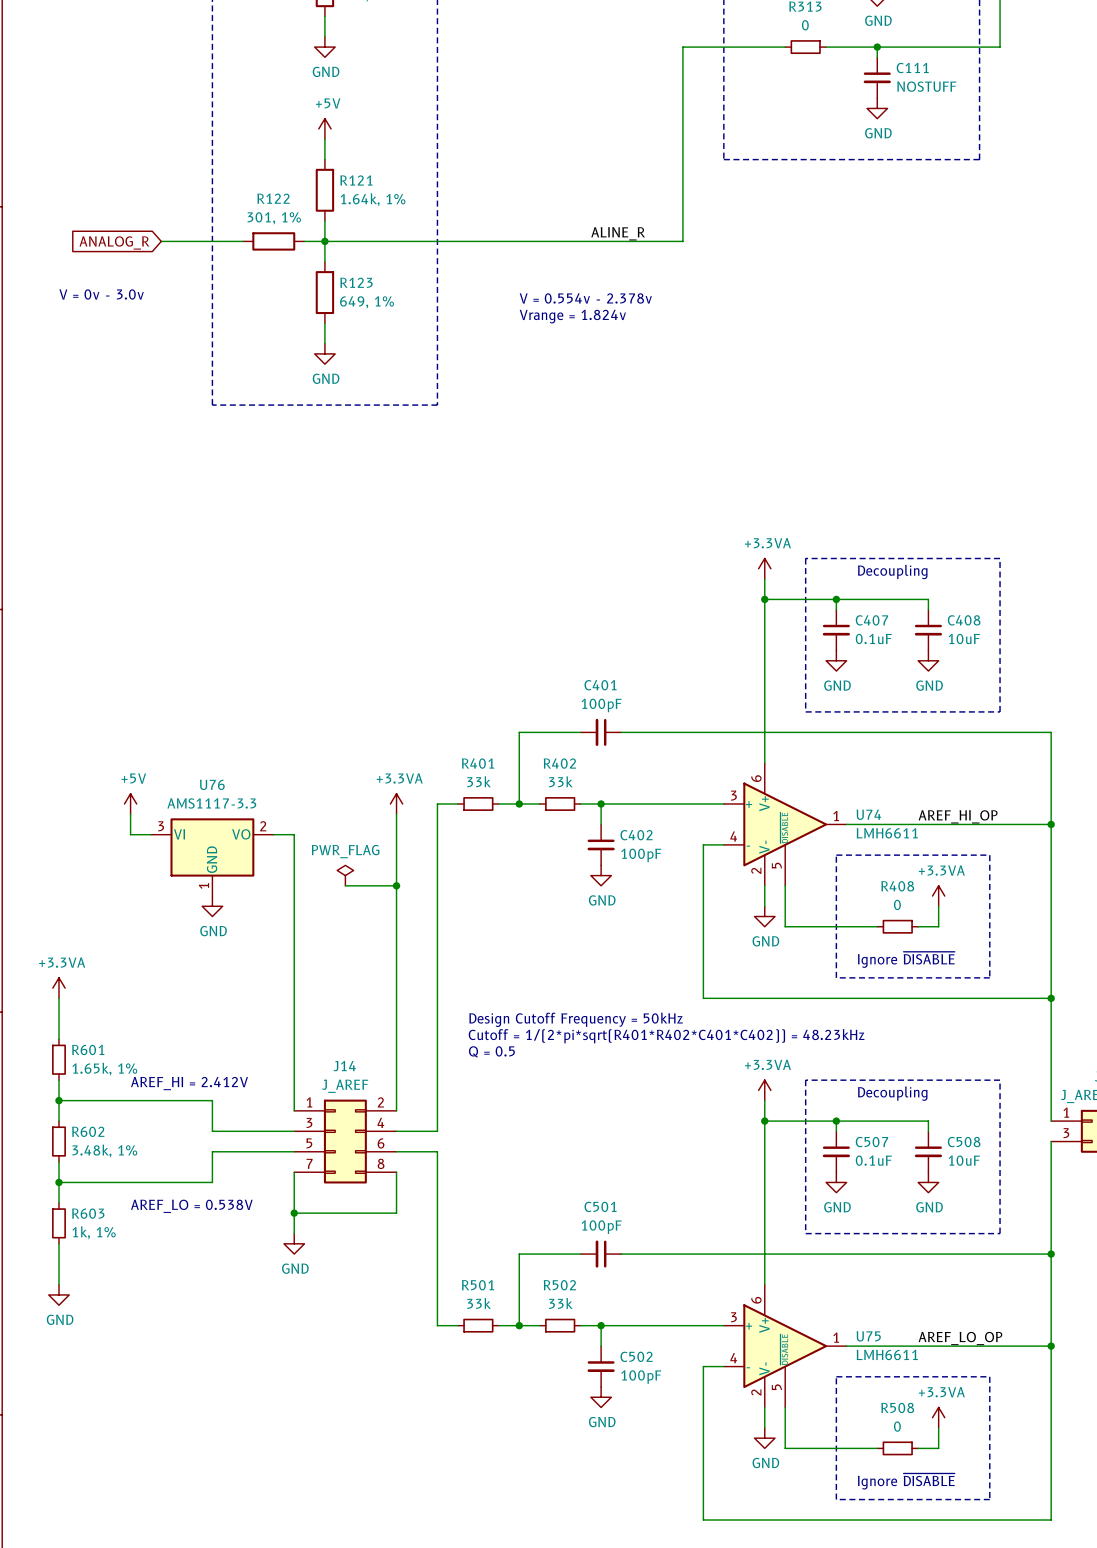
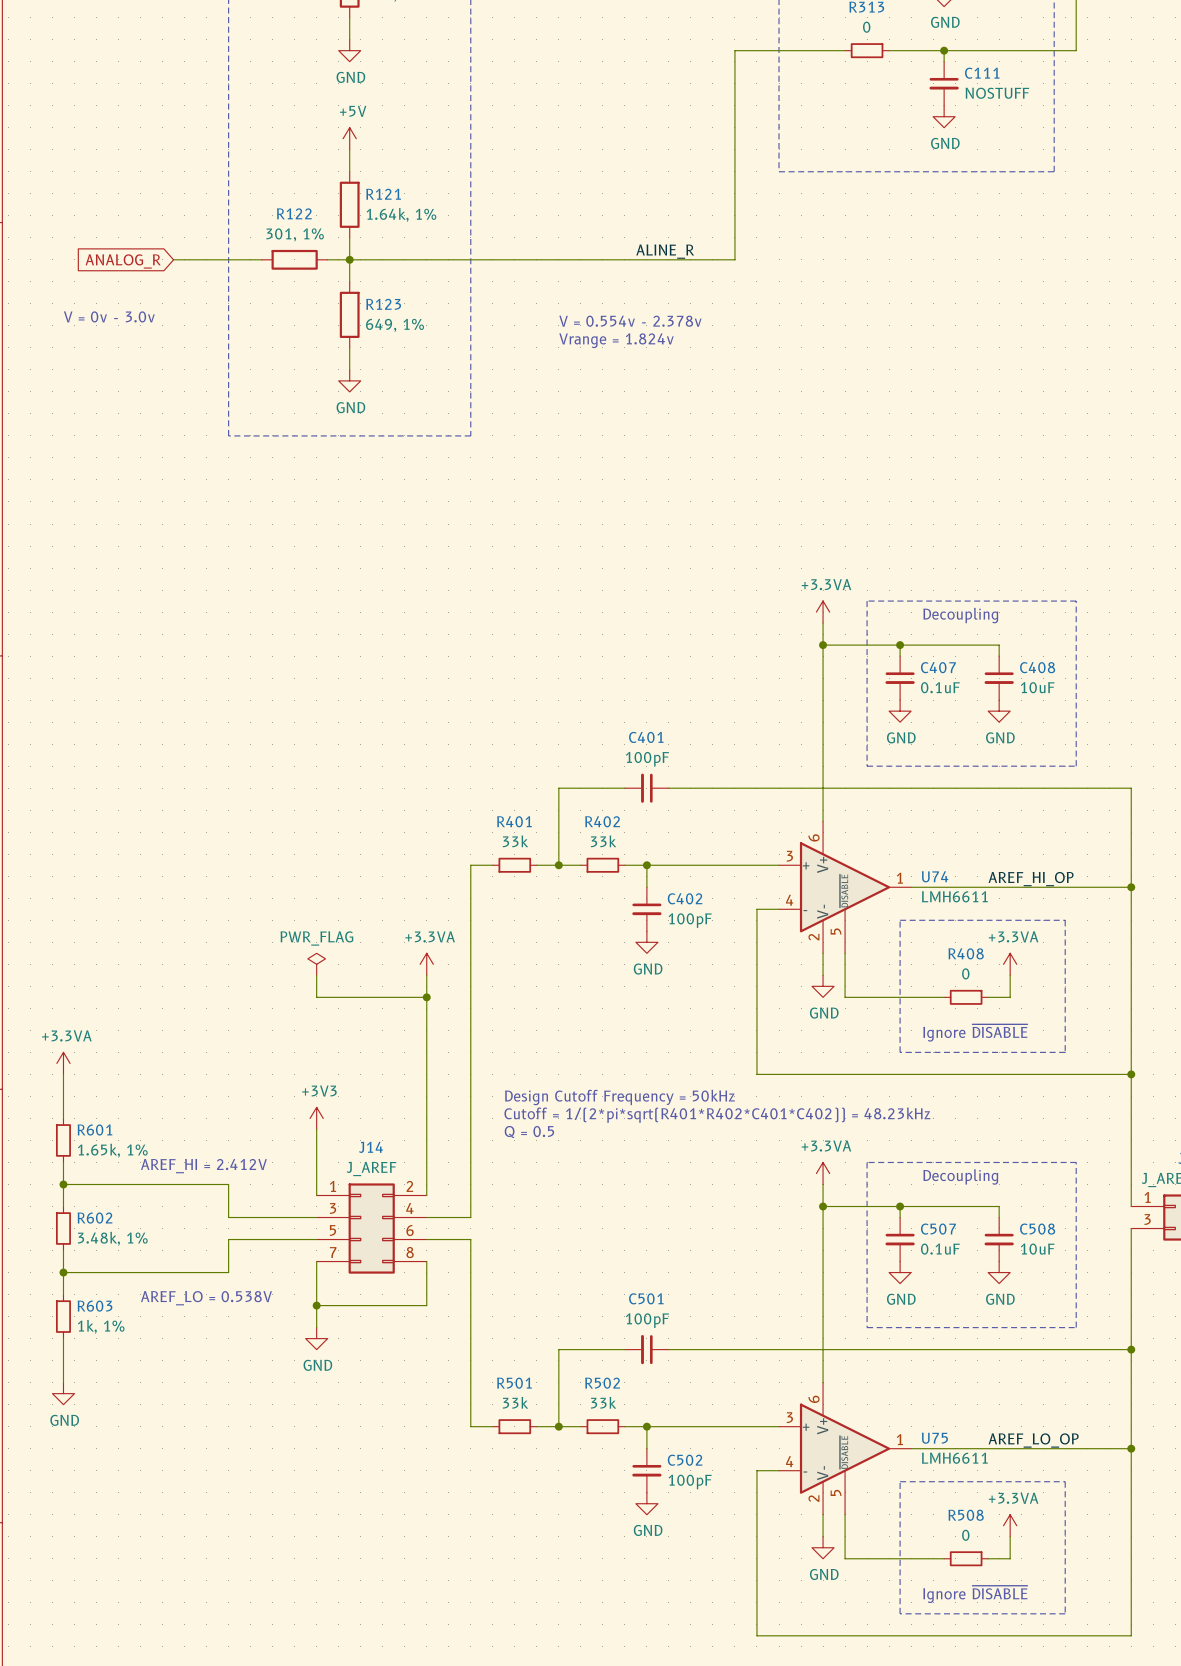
power symbol: +5V (130, 804) -> none
power symbol position: +3.3VA (396, 804) -> +3.3VA (426, 964)
wire: (130, 814) (130, 834) (151, 834) -> none
wire: (396, 814) (396, 906) -> none
wire: (273, 834) (294, 834) (294, 906) -> none
U76: AMS1117-3.3 (212, 857) -> none
power symbol position: PWR_FLAG (345, 875) -> PWR_FLAG (316, 964)
wire: (345, 885) (396, 885) -> none
junction position: (396, 885) -> (426, 997)
power symbol: GND (212, 906) -> none
wire: (294, 926) (294, 1049) -> (316, 997) (426, 997)
power symbol: none -> +3V3 (316, 1118)

